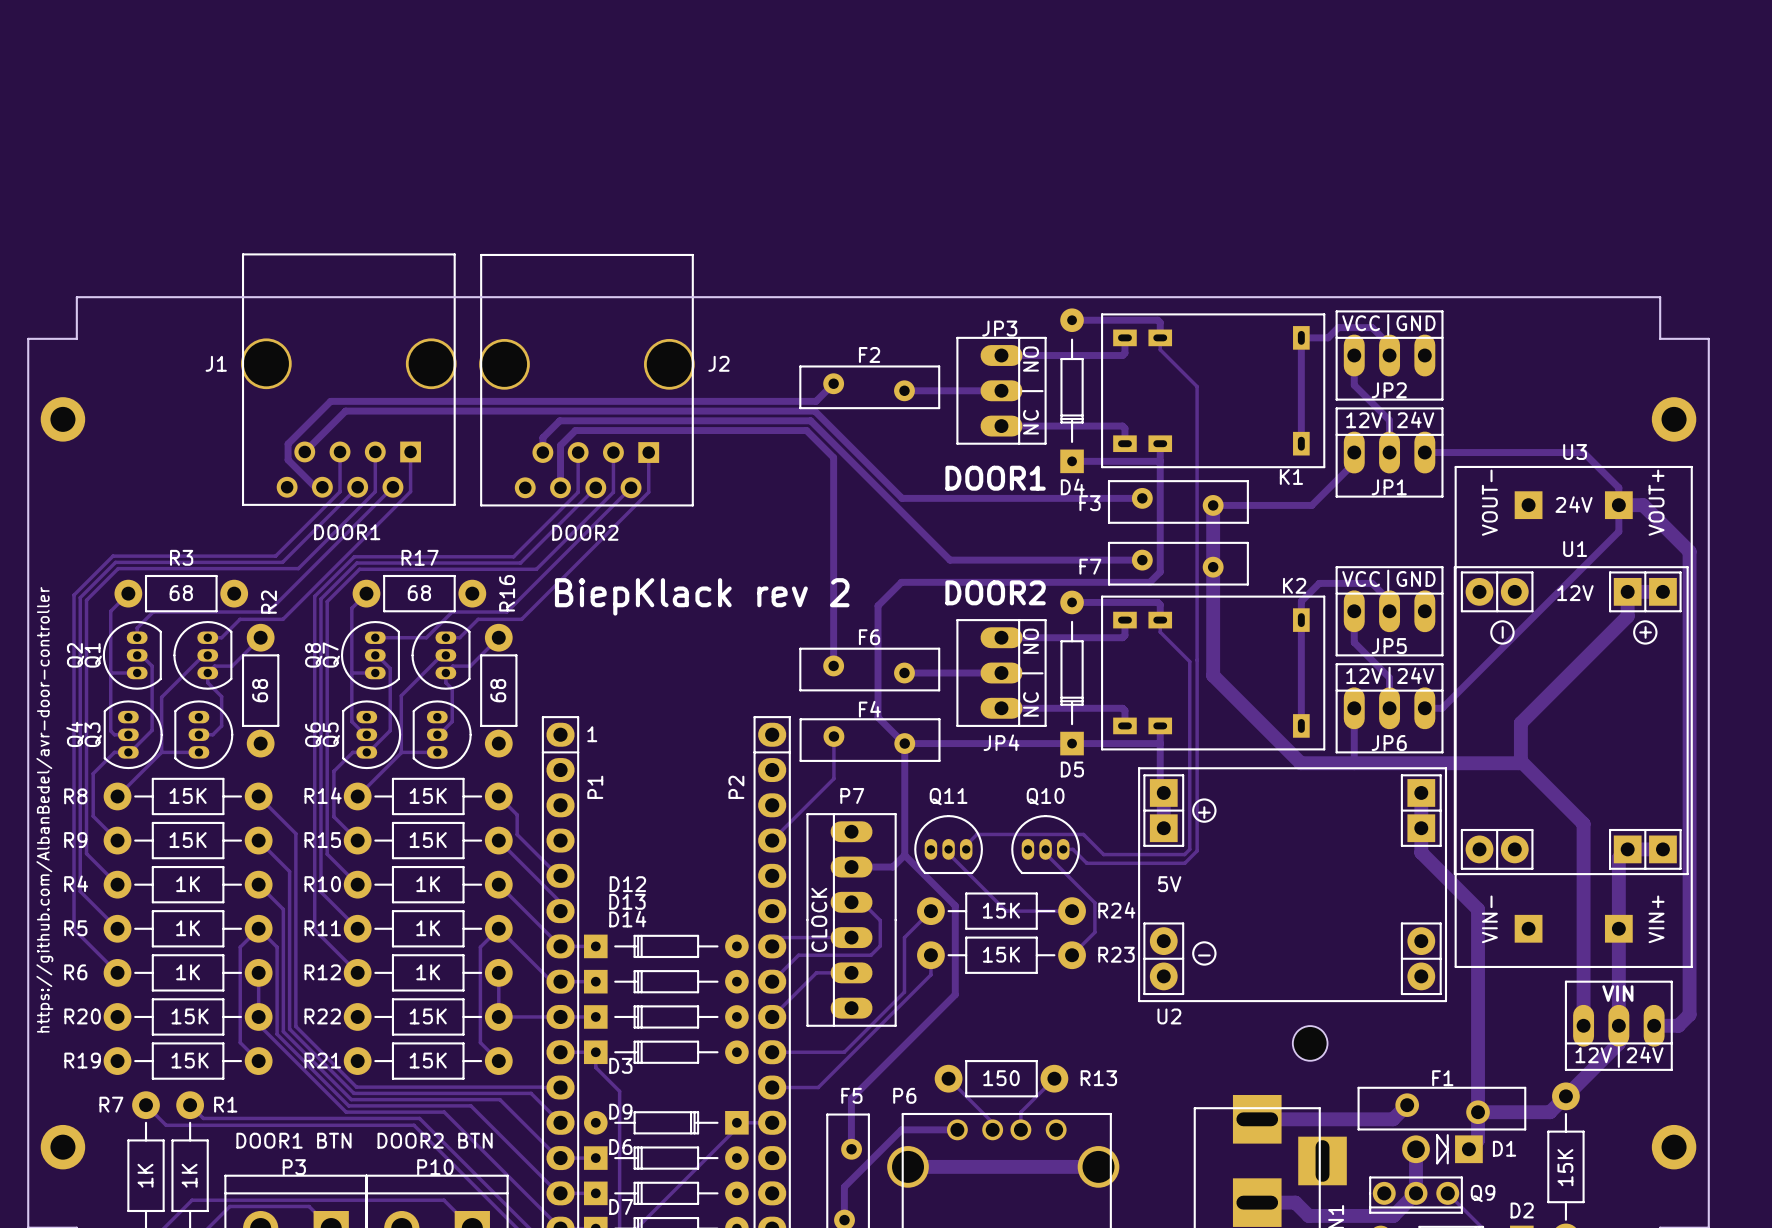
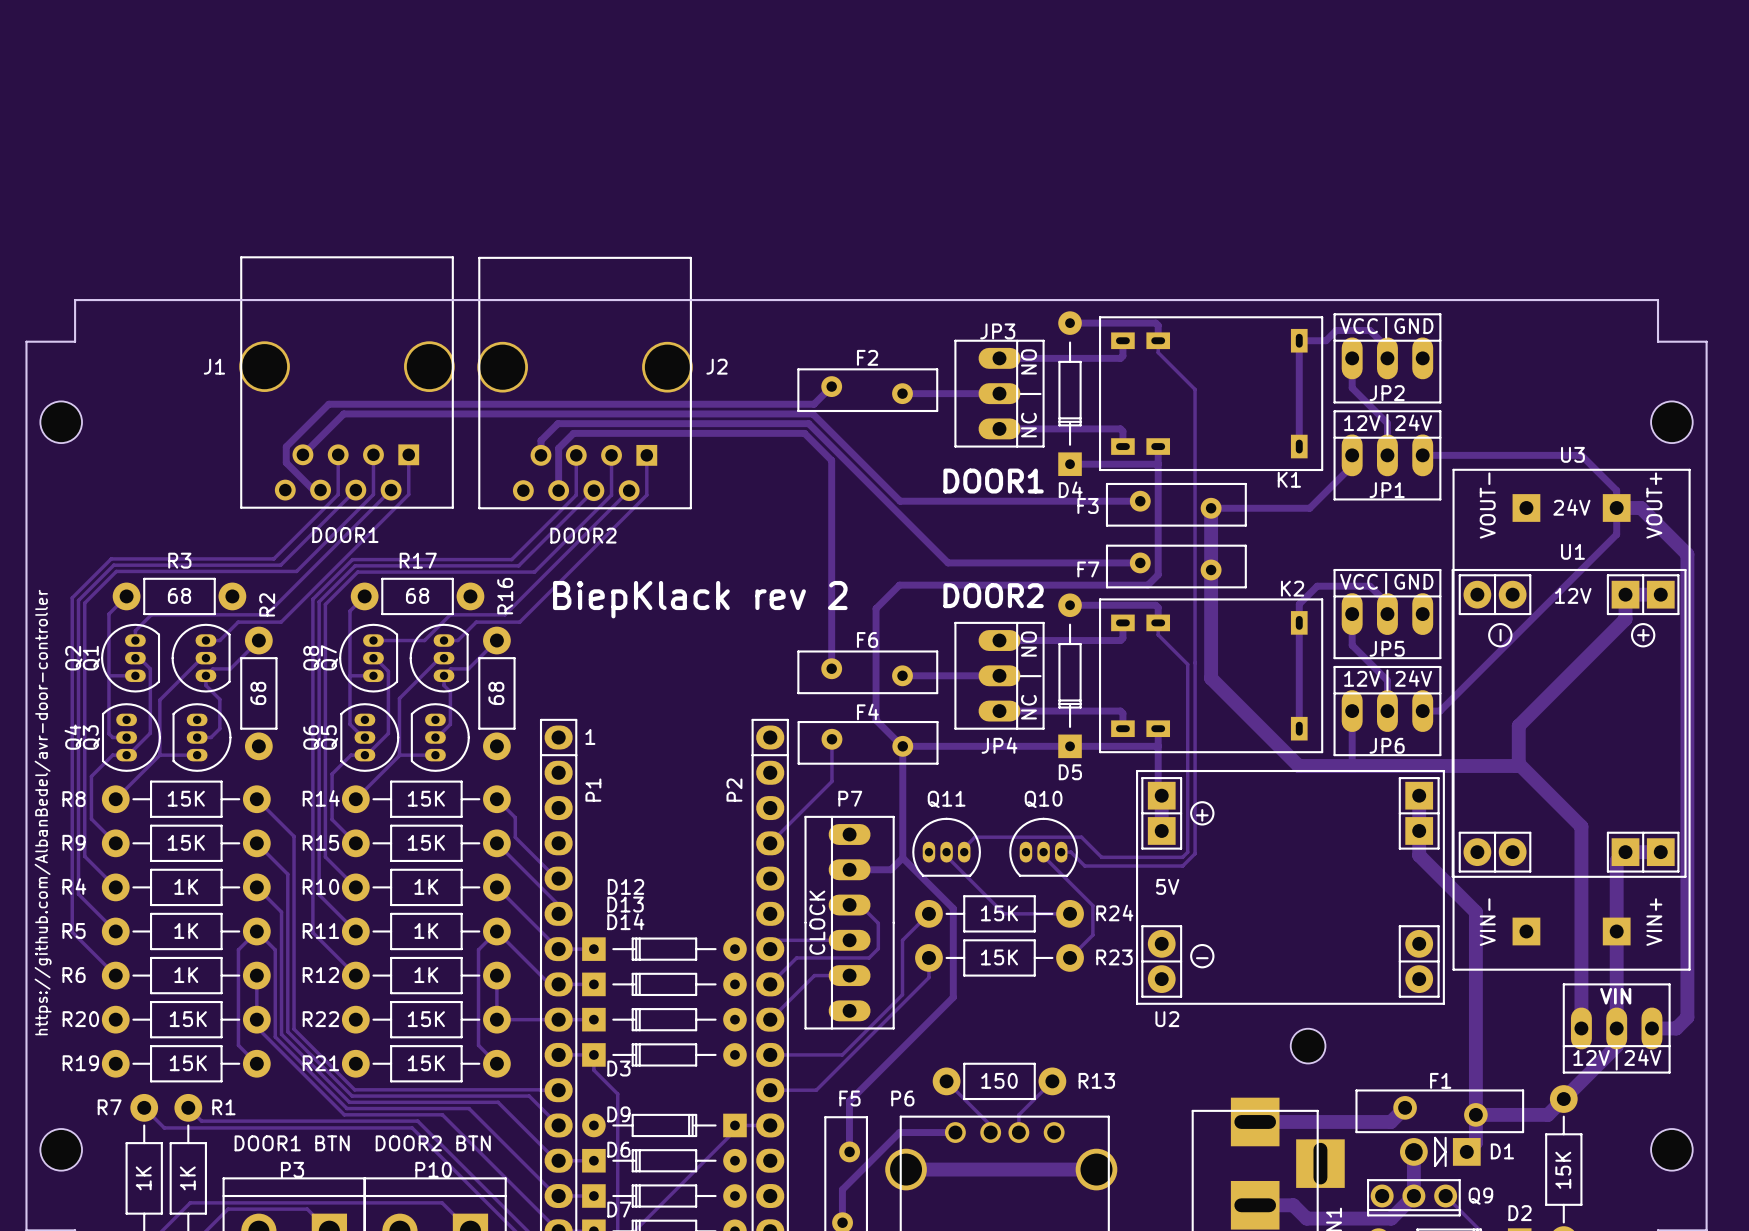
part footprint: [40, 397, 86, 442] -> [40, 401, 83, 444]
part footprint: [1651, 397, 1697, 442] -> [1651, 401, 1693, 444]
part footprint: [40, 1124, 86, 1170] -> [40, 1129, 83, 1171]
part footprint: [1651, 1124, 1697, 1170] -> [1651, 1129, 1693, 1171]

